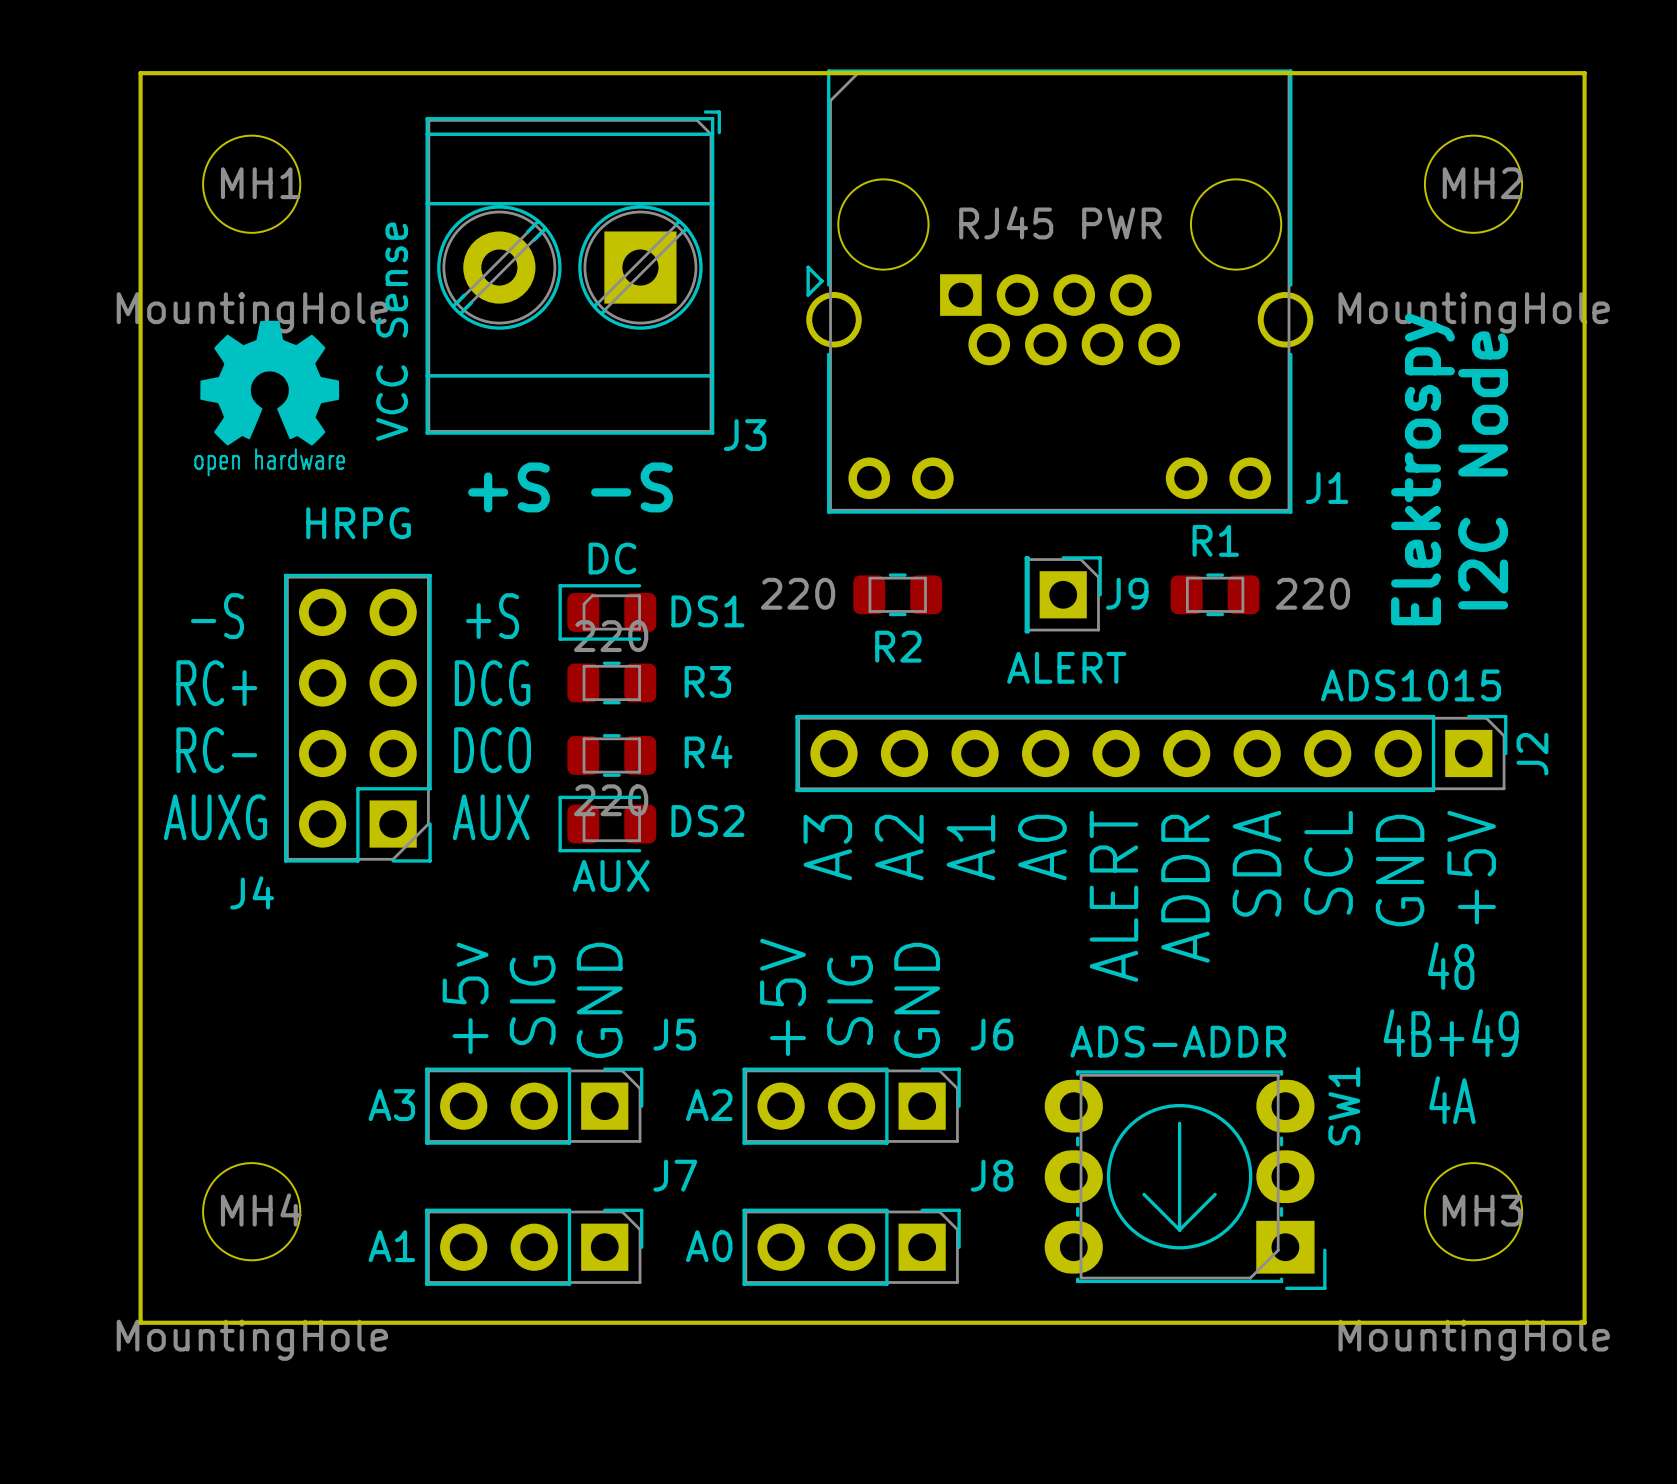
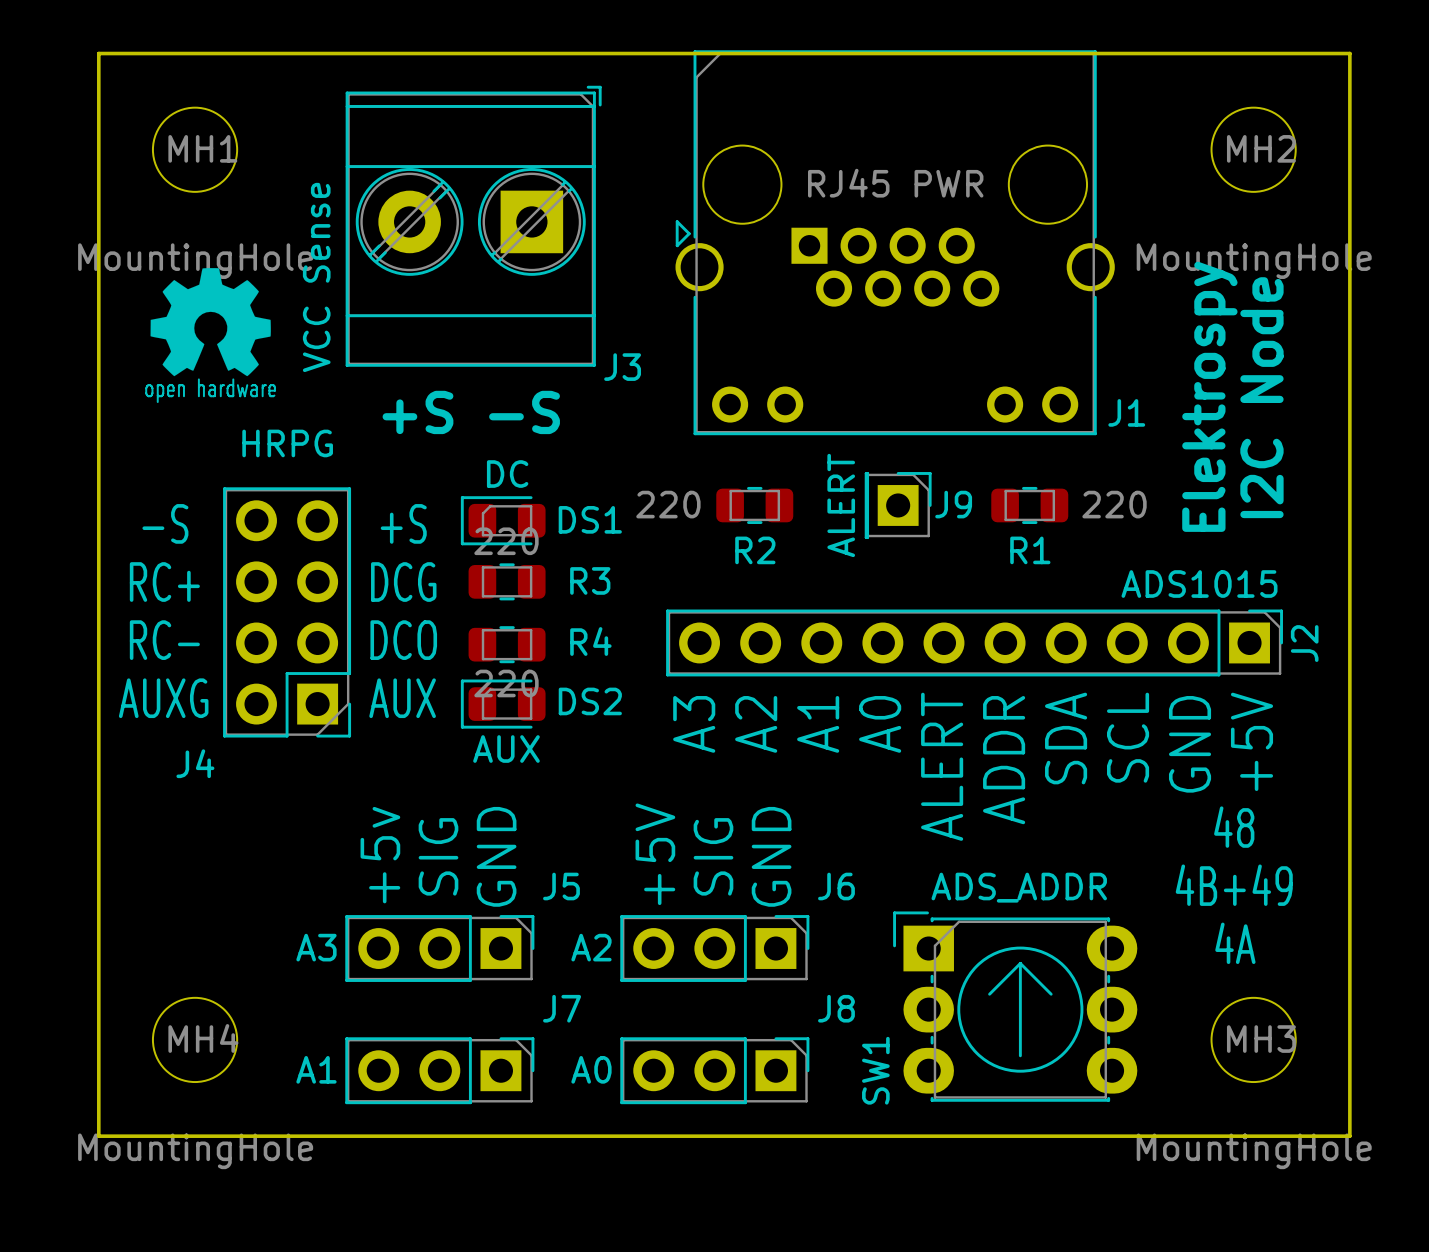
R1 name position: R1 (1215, 540) -> R1 (1030, 550)
J9 value rotation: 0° (1066, 667) -> 90° counterclockwise (841, 505)
SW1 value: ADS-ADDR (1178, 1041) -> ADS_ADDR (1019, 887)
SW1 rotation: 0° (1185, 1180) -> 180° (1015, 1006)

